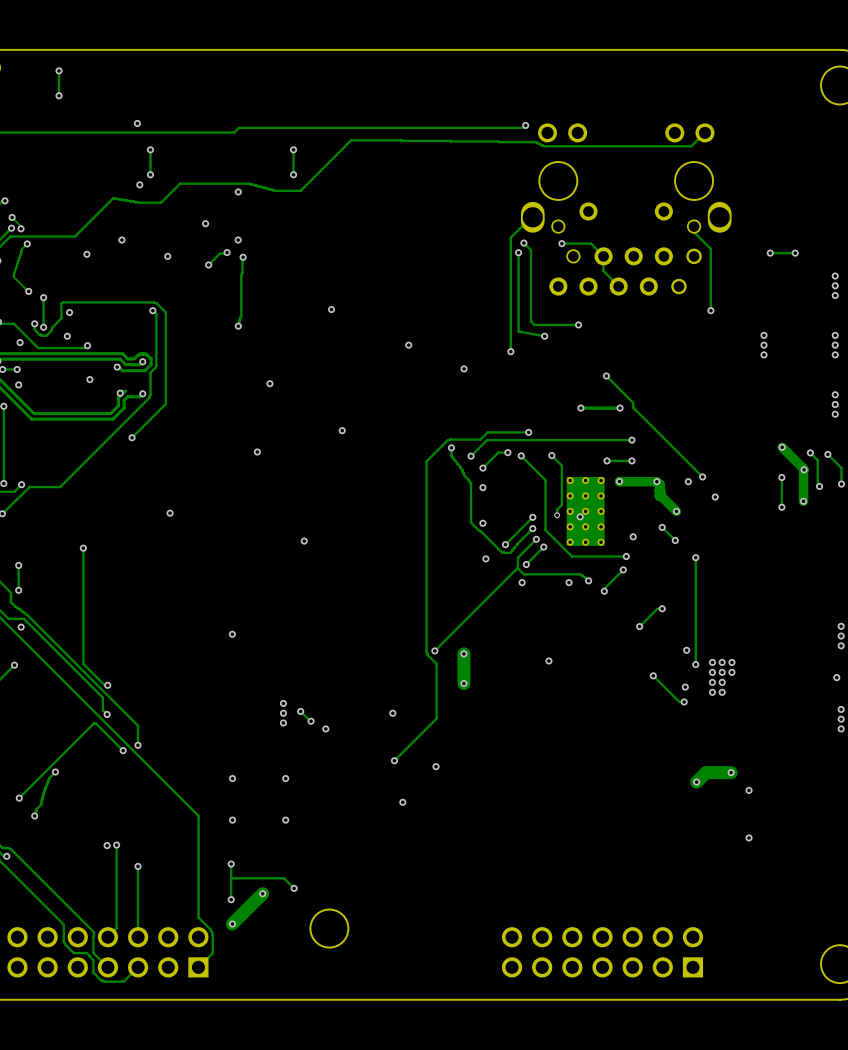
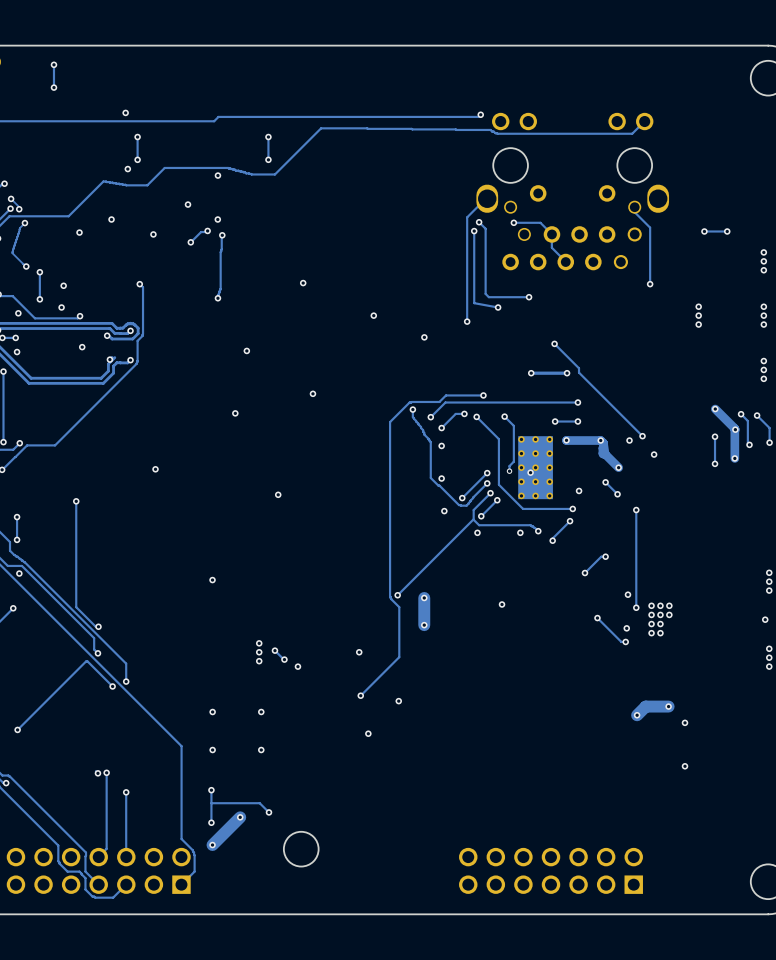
track: (34, 323) (34, 329) (40, 335) (46, 335) (61, 318) (62, 302) (154, 302) (165, 312) (165, 403) (132, 437) -> none
via: (34, 323) -> none
via: (132, 437) -> none
track: (55, 772) (49, 777) (41, 804) (35, 812) -> none
via: (55, 772) -> none
via: (34, 815) -> none

